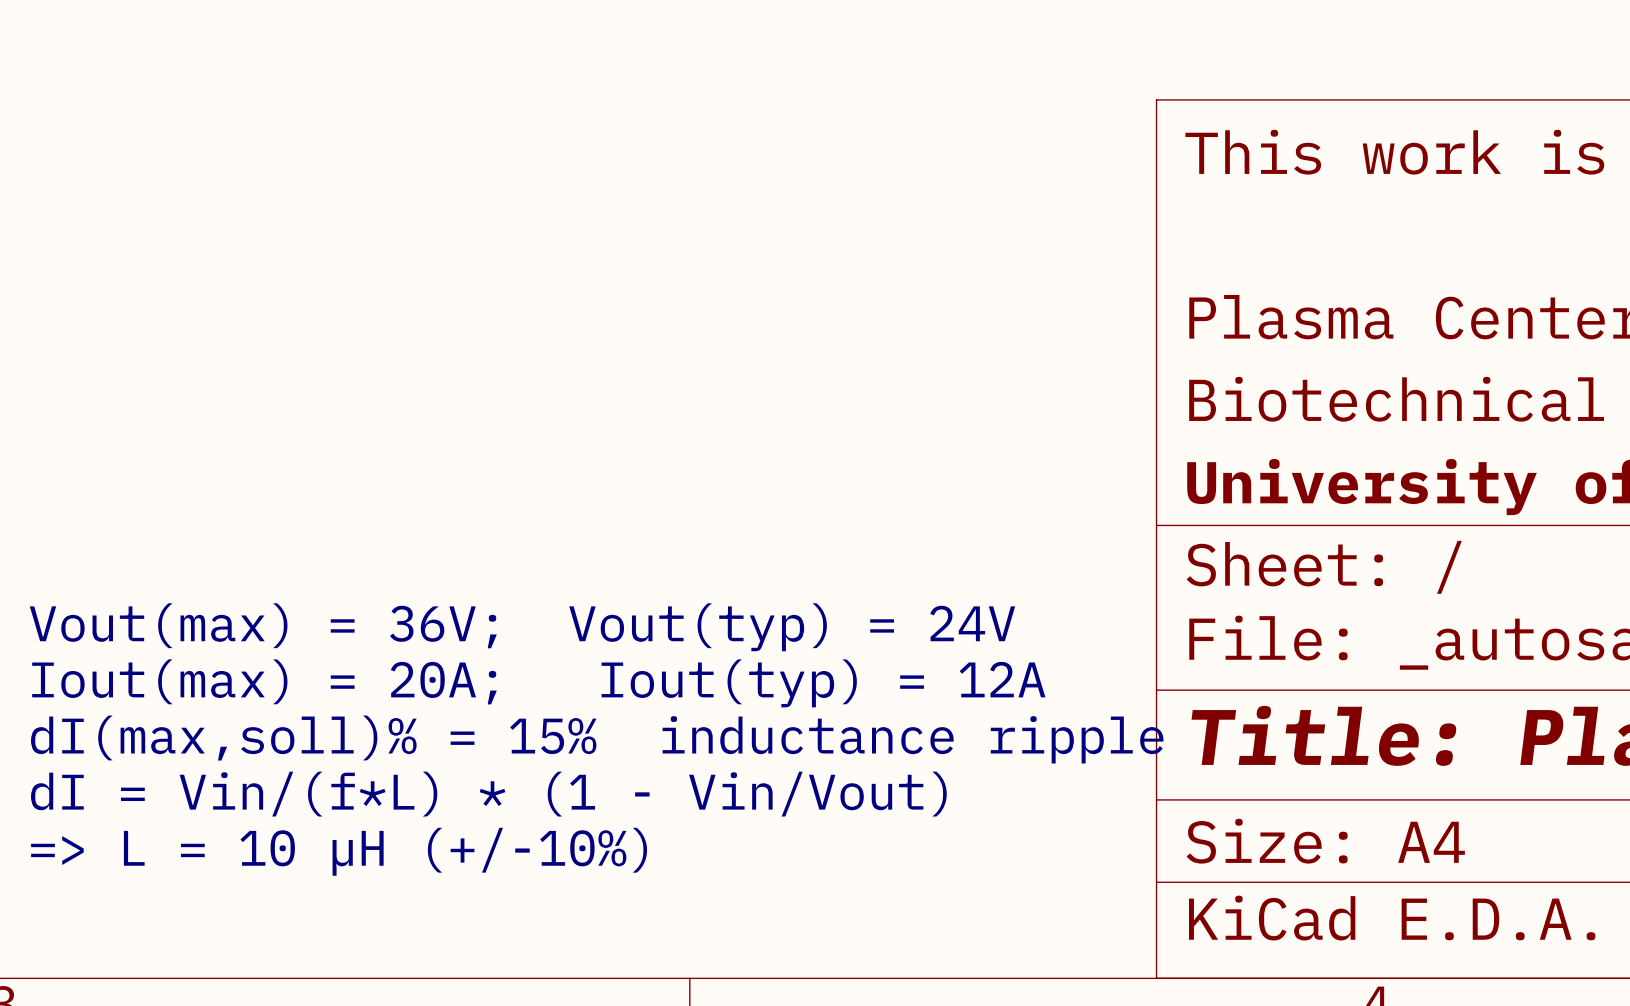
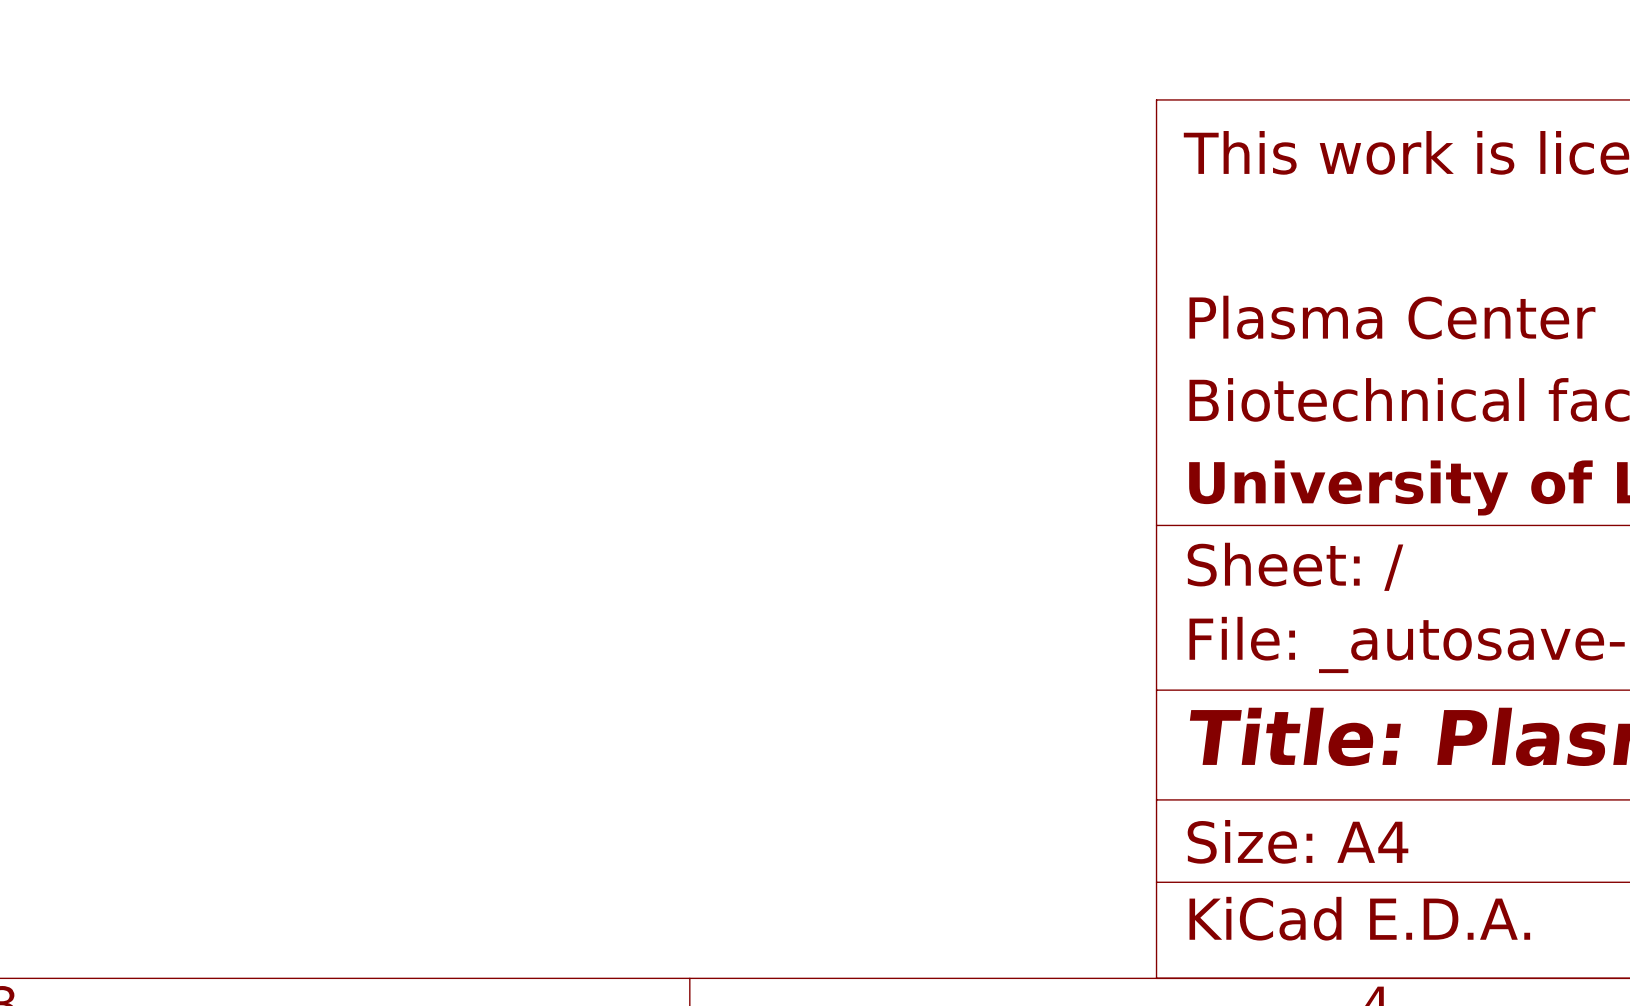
text: Vout(max) = 36V; Vout(typ) = 24V (522, 627) -> none
text: Iout(max) = 20A; Iout(typ) = 12A (538, 683) -> none
text: dI(max,soll)% = 15% inductance ripple (597, 739) -> none
text: dI = Vin/(f*L) * (1 - Vin/Vout) (488, 794) -> none
text: => L = 10 µH (+/-10%) (339, 851) -> none

